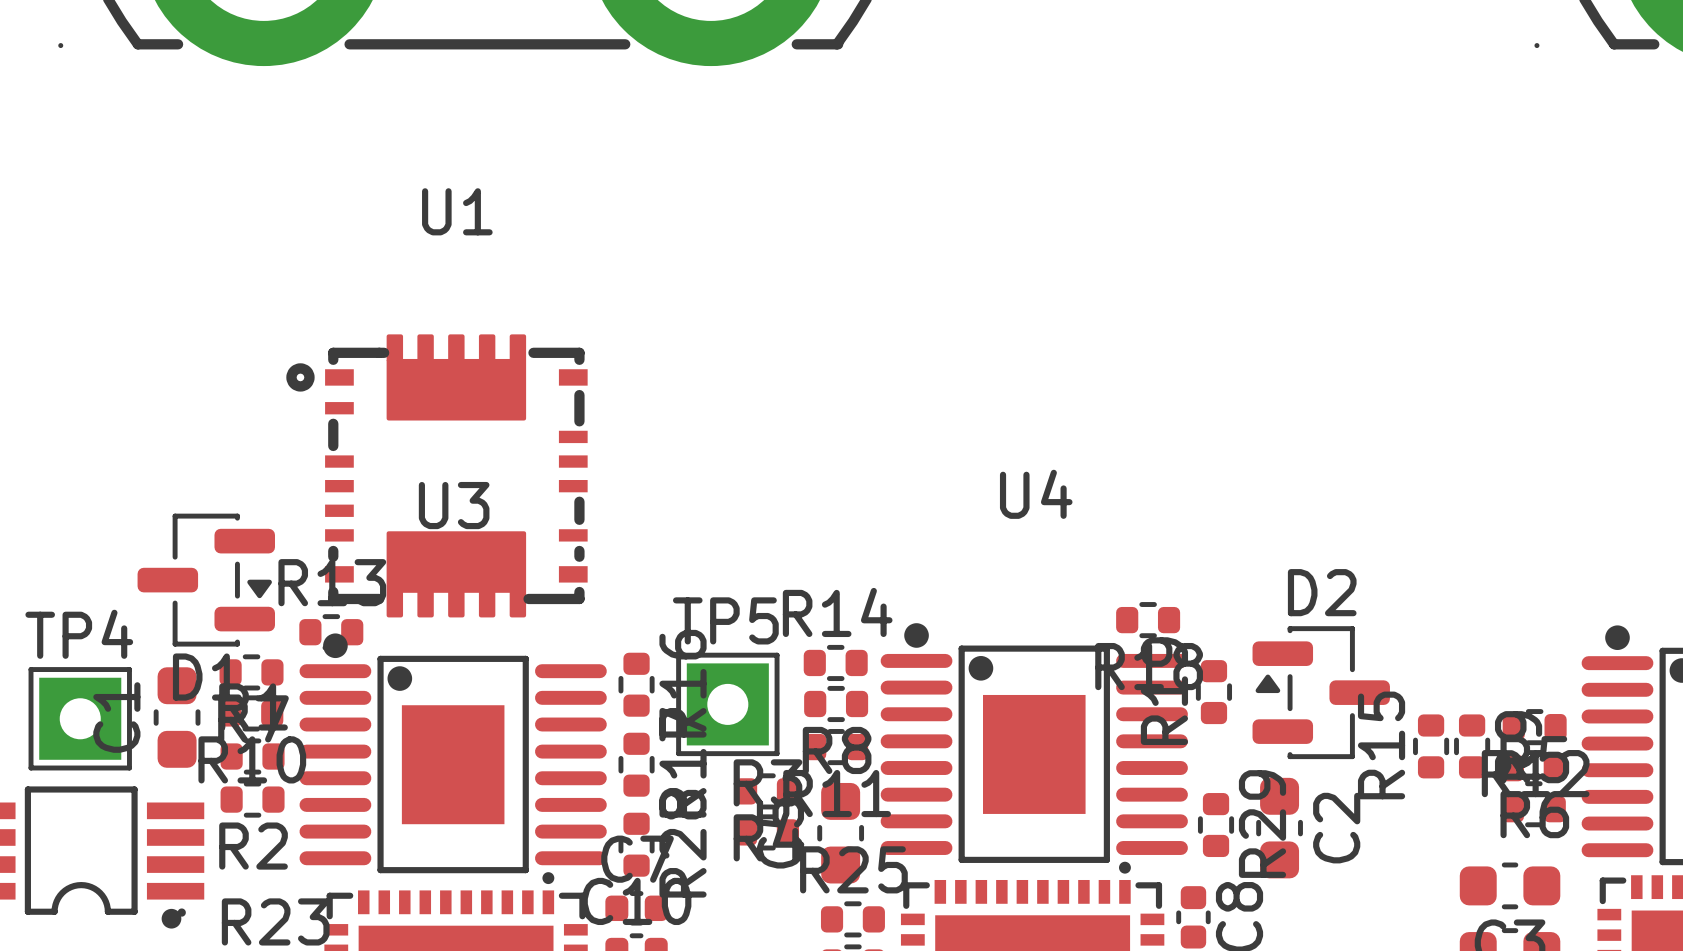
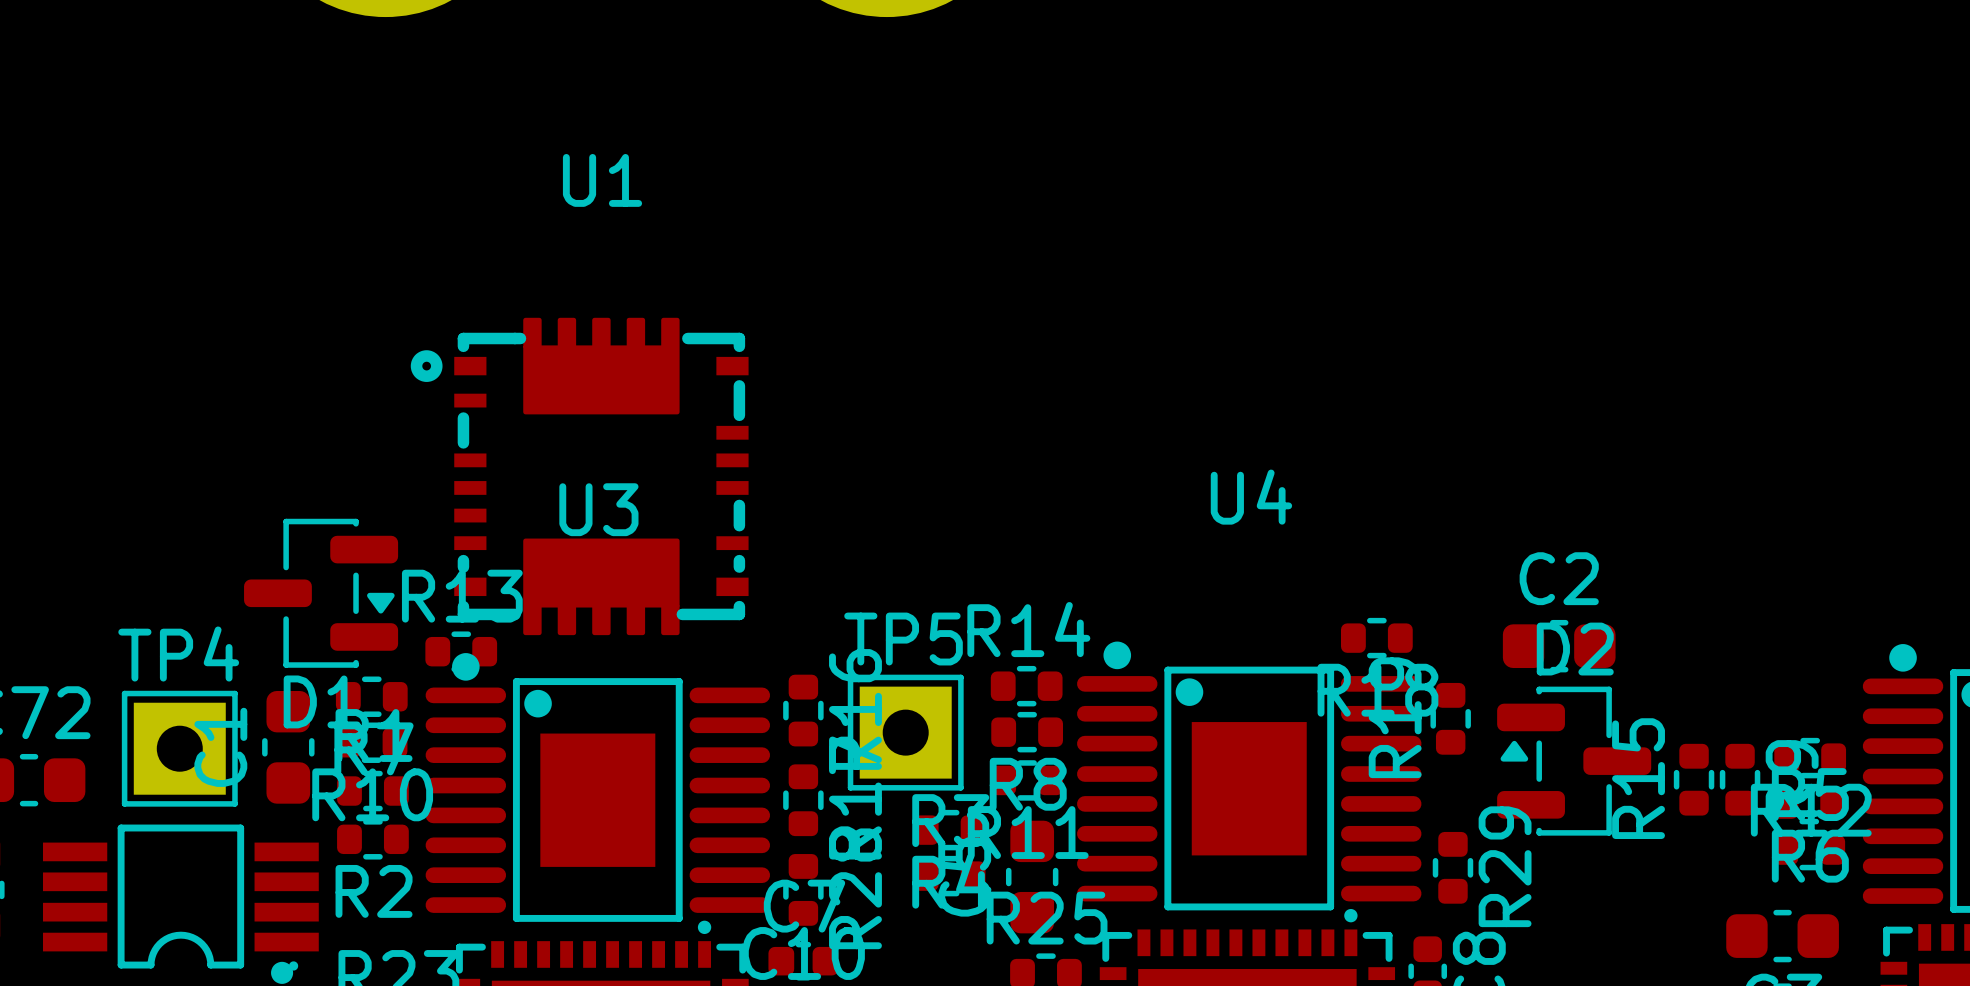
D2 position: (1321, 692) -> (1574, 761)
C2 rotation: 0° (1279, 828) -> 90° clockwise (1559, 646)
C2 position: (1279, 828) -> (1559, 646)
C2 name position: C2 (1336, 828) -> C2 (1559, 578)

